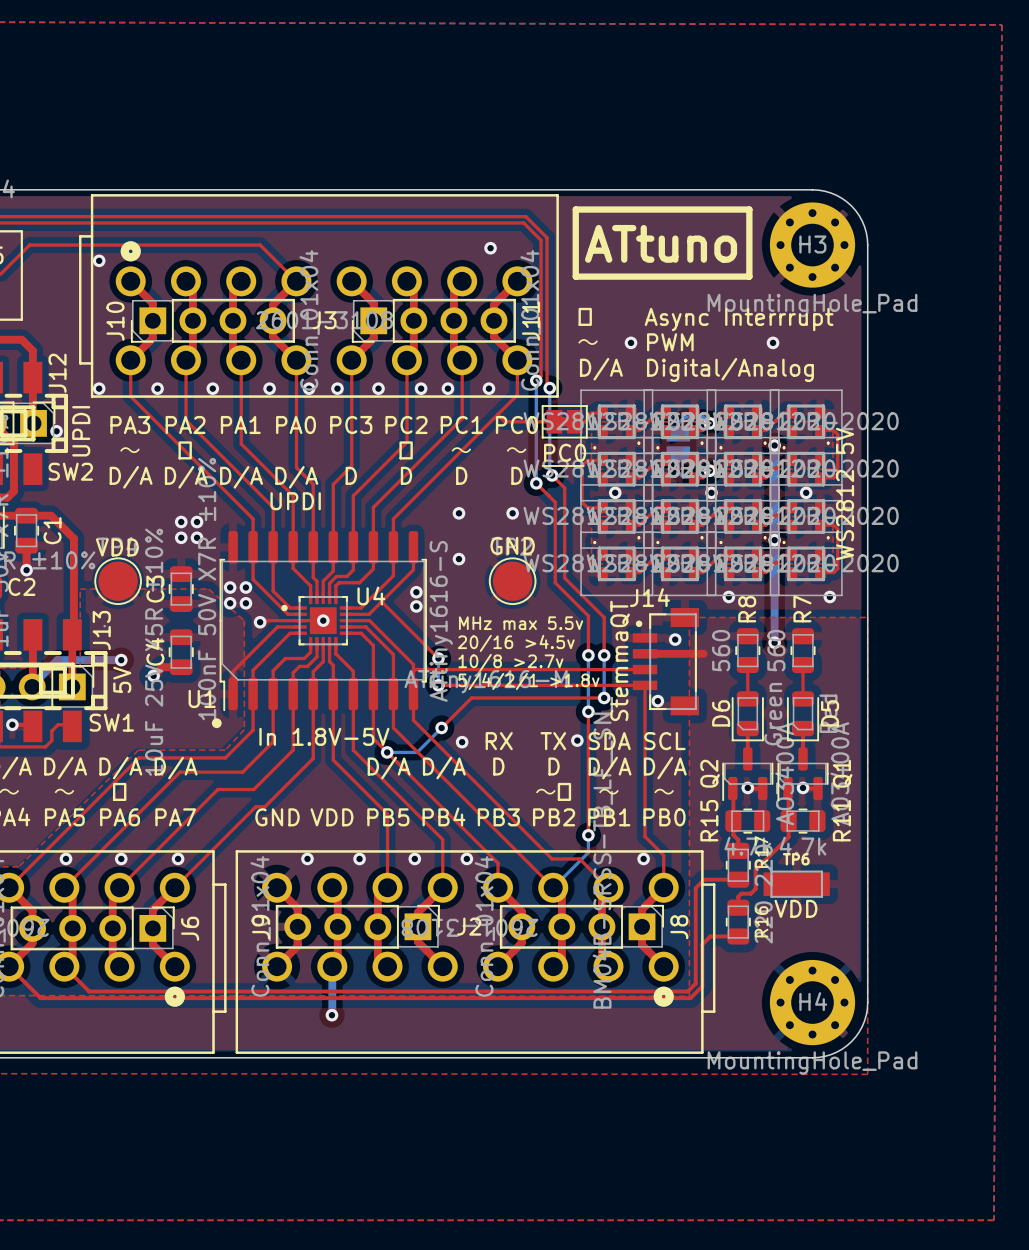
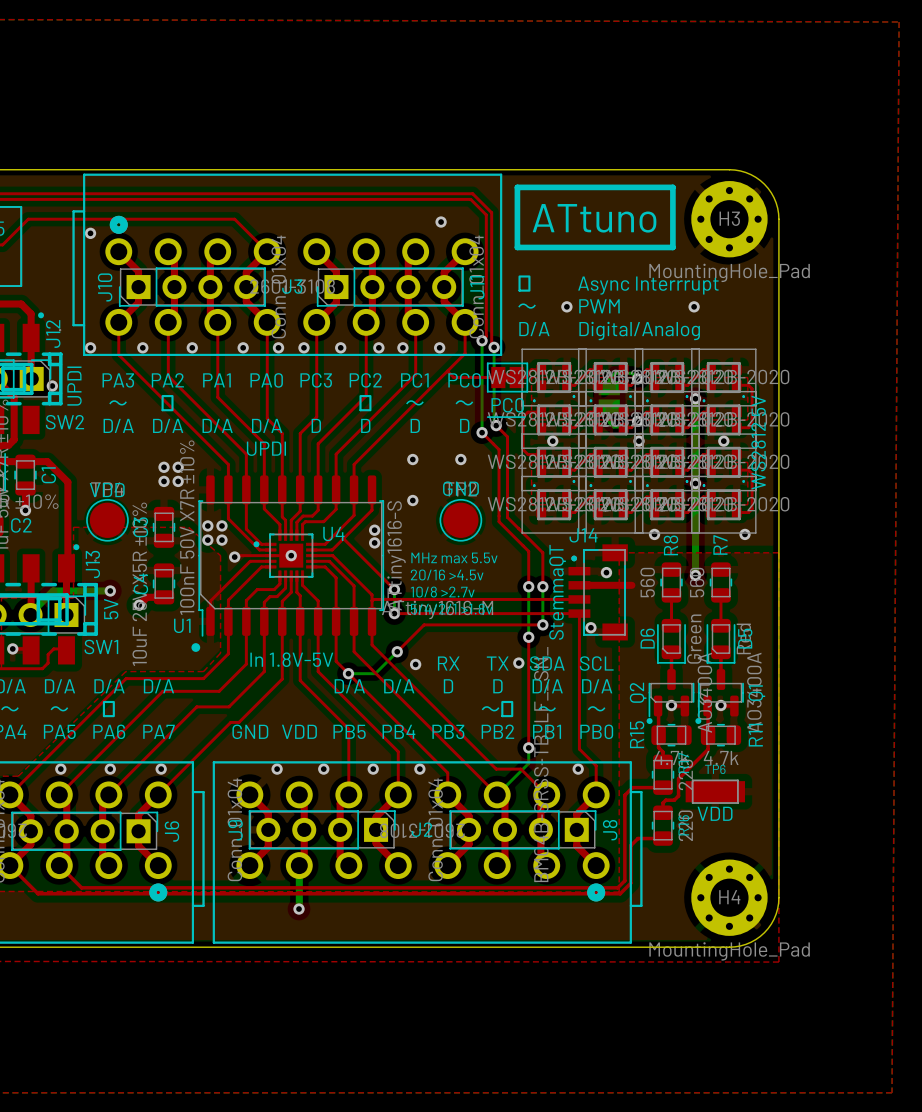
drawing: none -> [38, 312, 45, 319]
drawing: none -> [73, 544, 80, 551]
drawing: none -> [646, 718, 653, 724]
drawing: none -> [695, 718, 702, 724]

